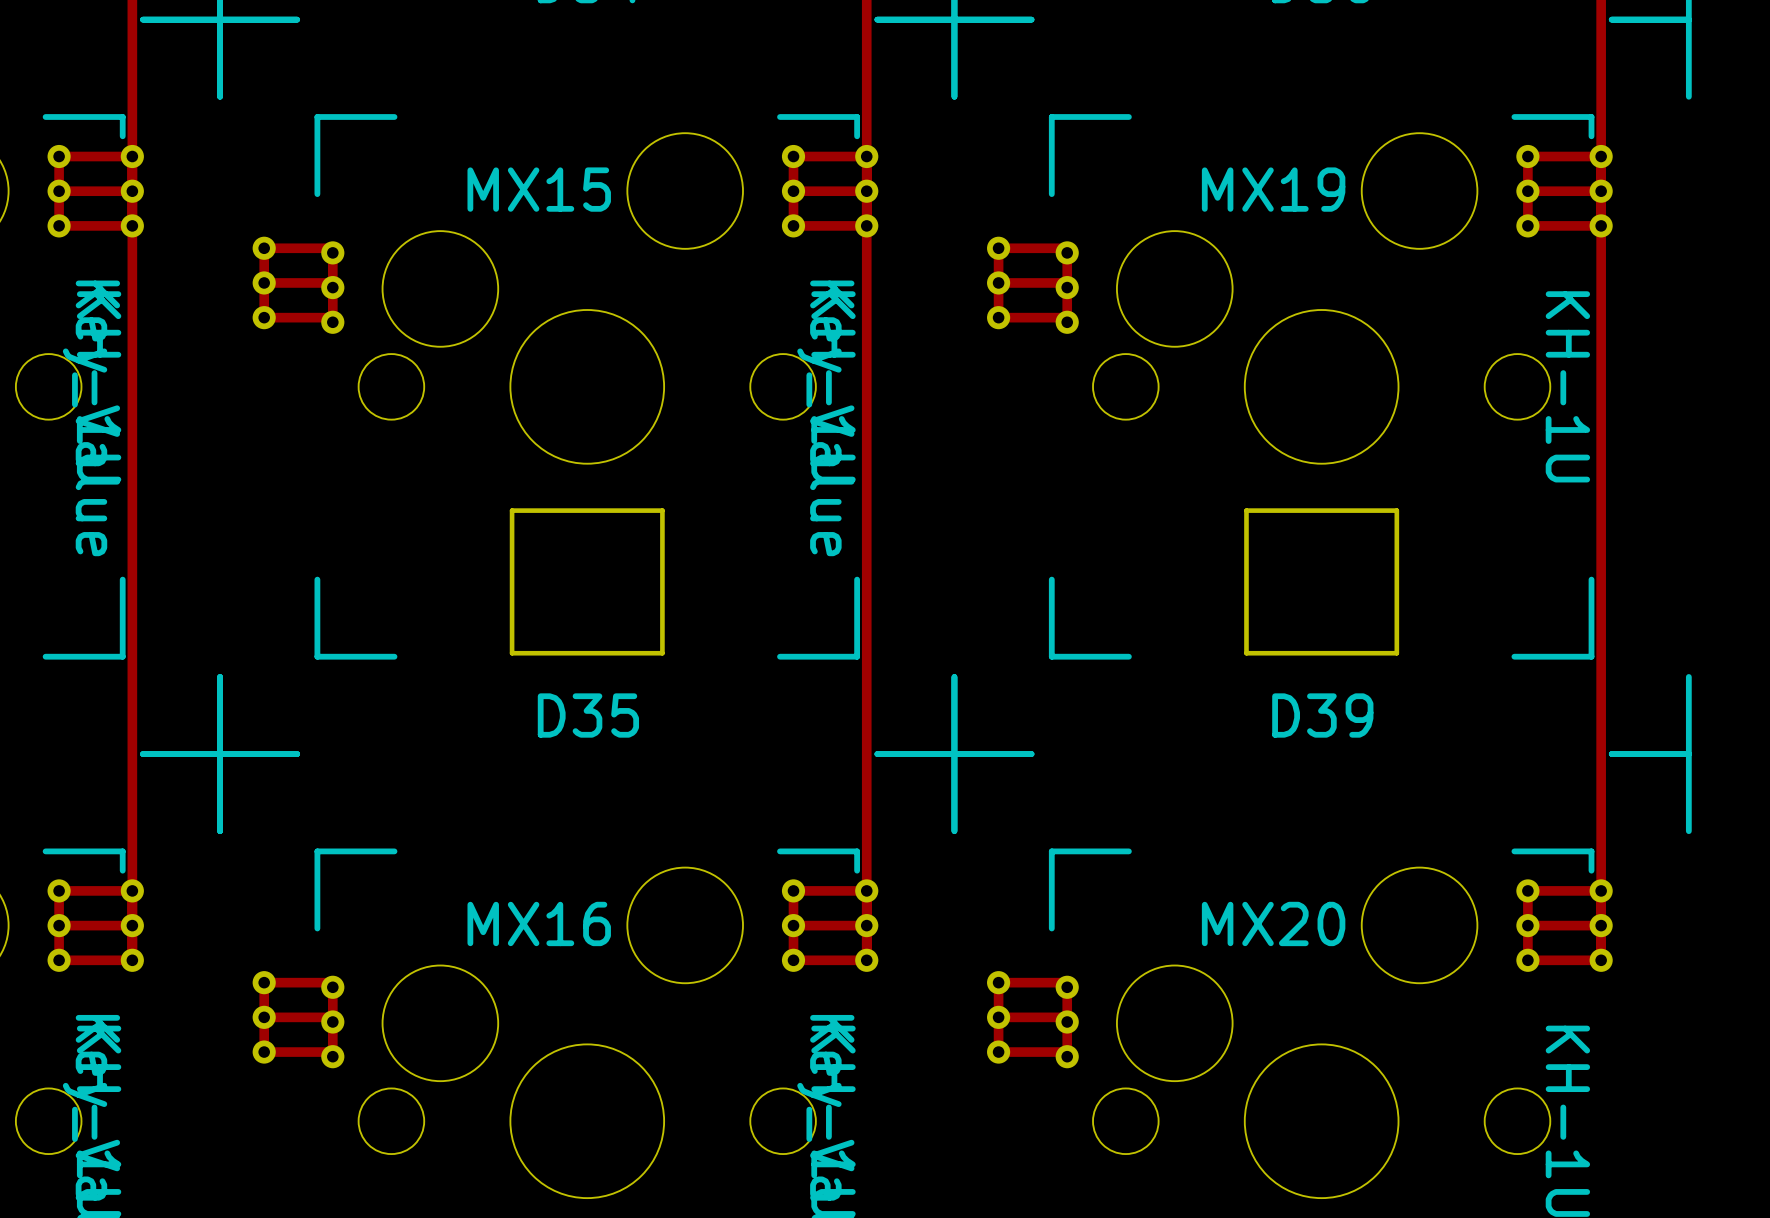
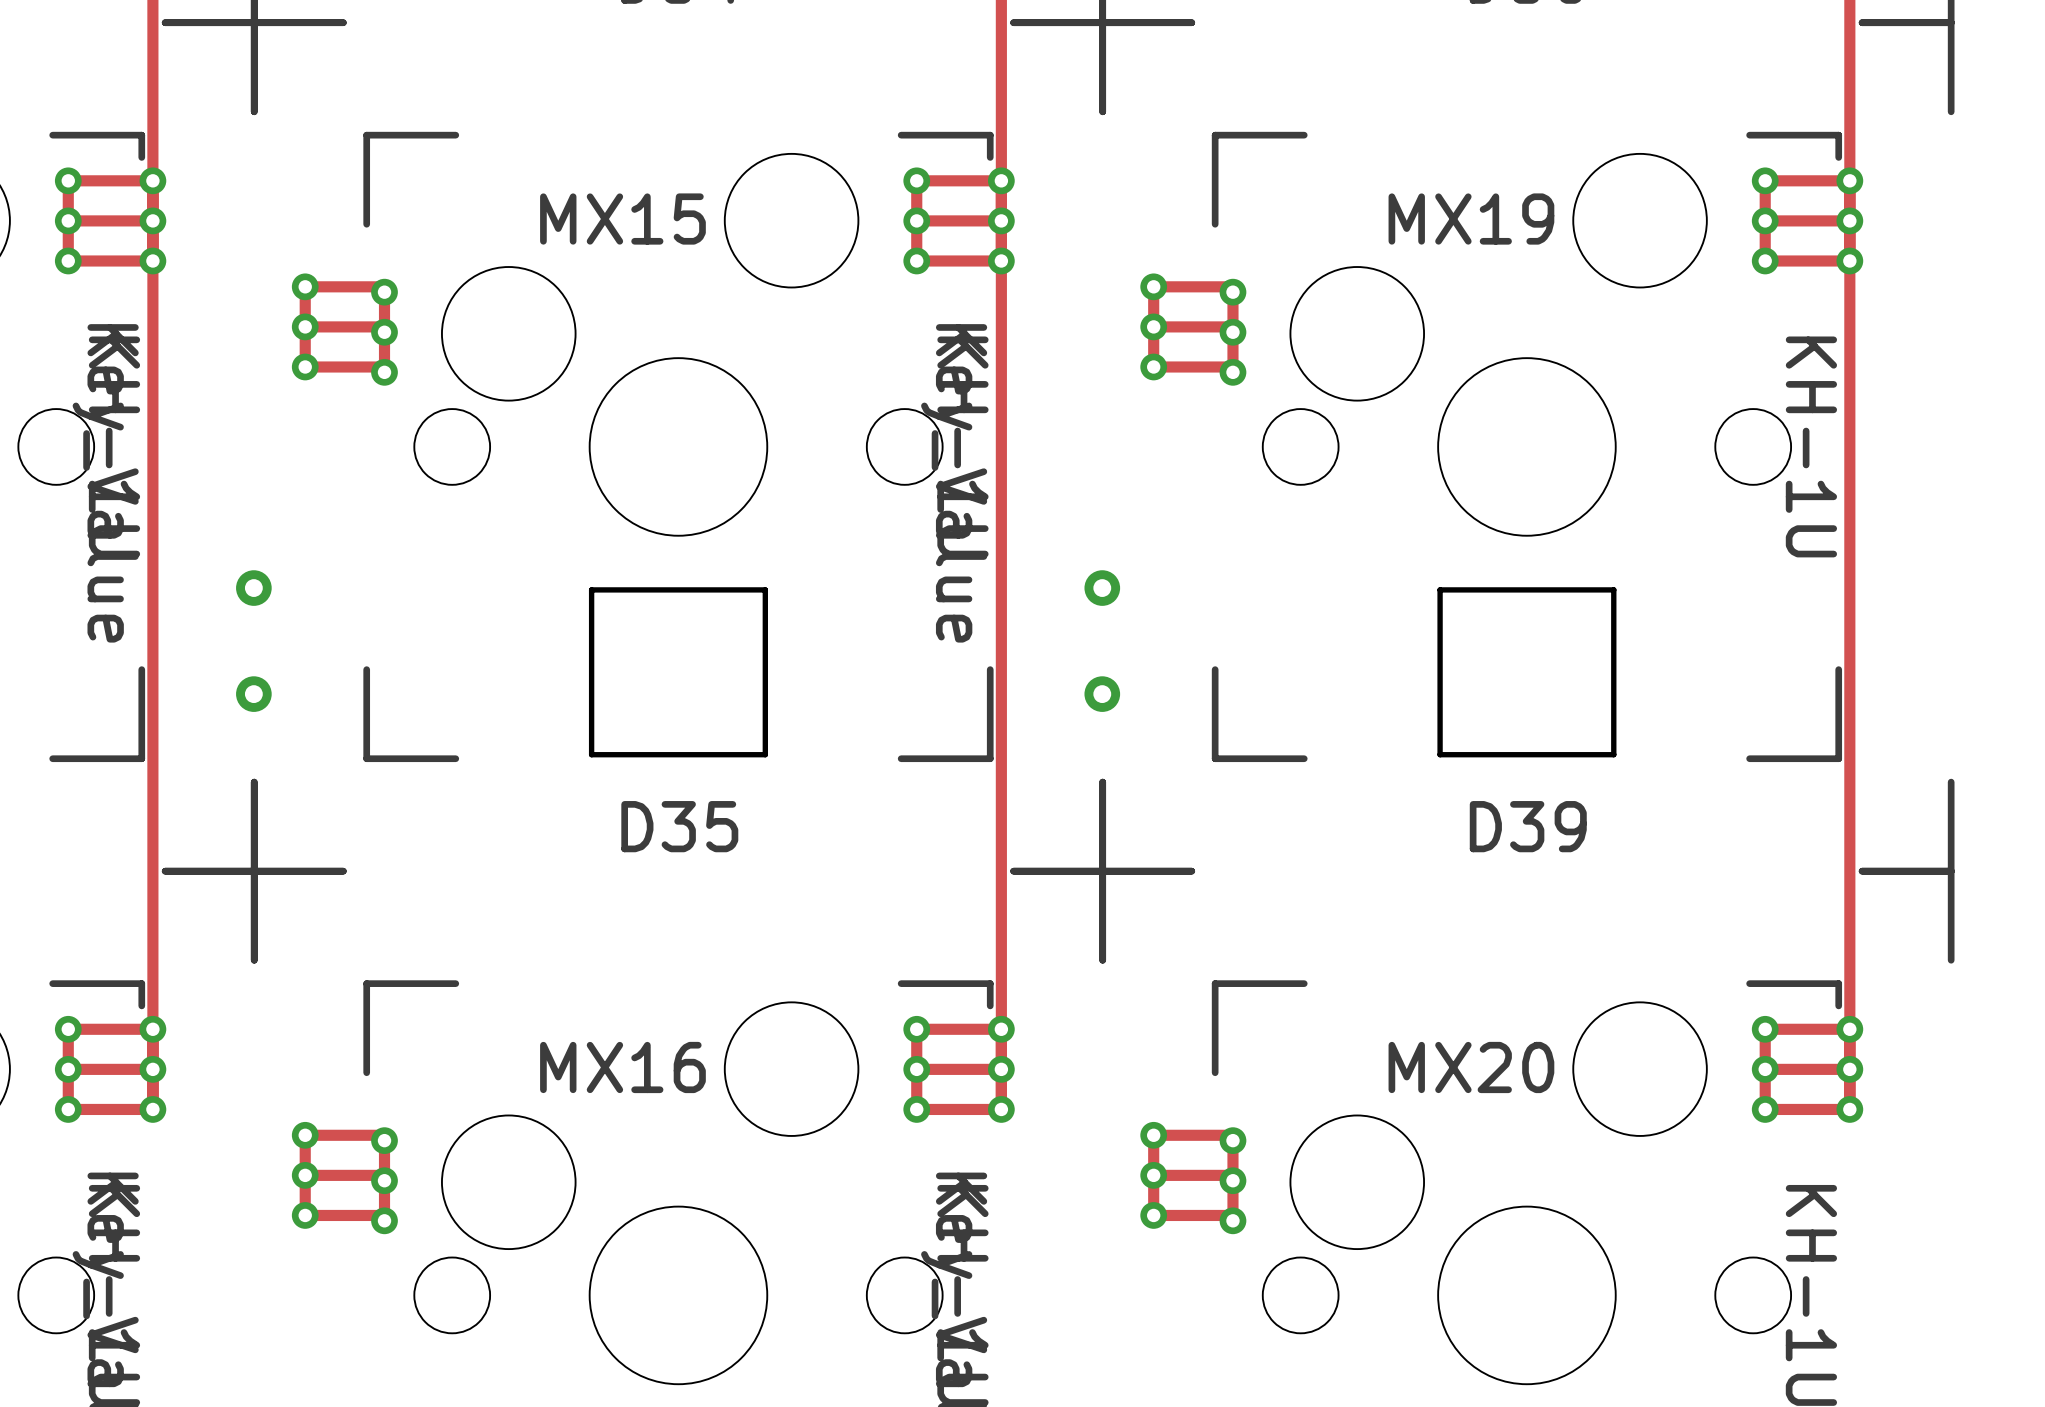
via: none -> (253, 588)
via: none -> (1102, 588)
via: none -> (253, 694)
via: none -> (1102, 694)

